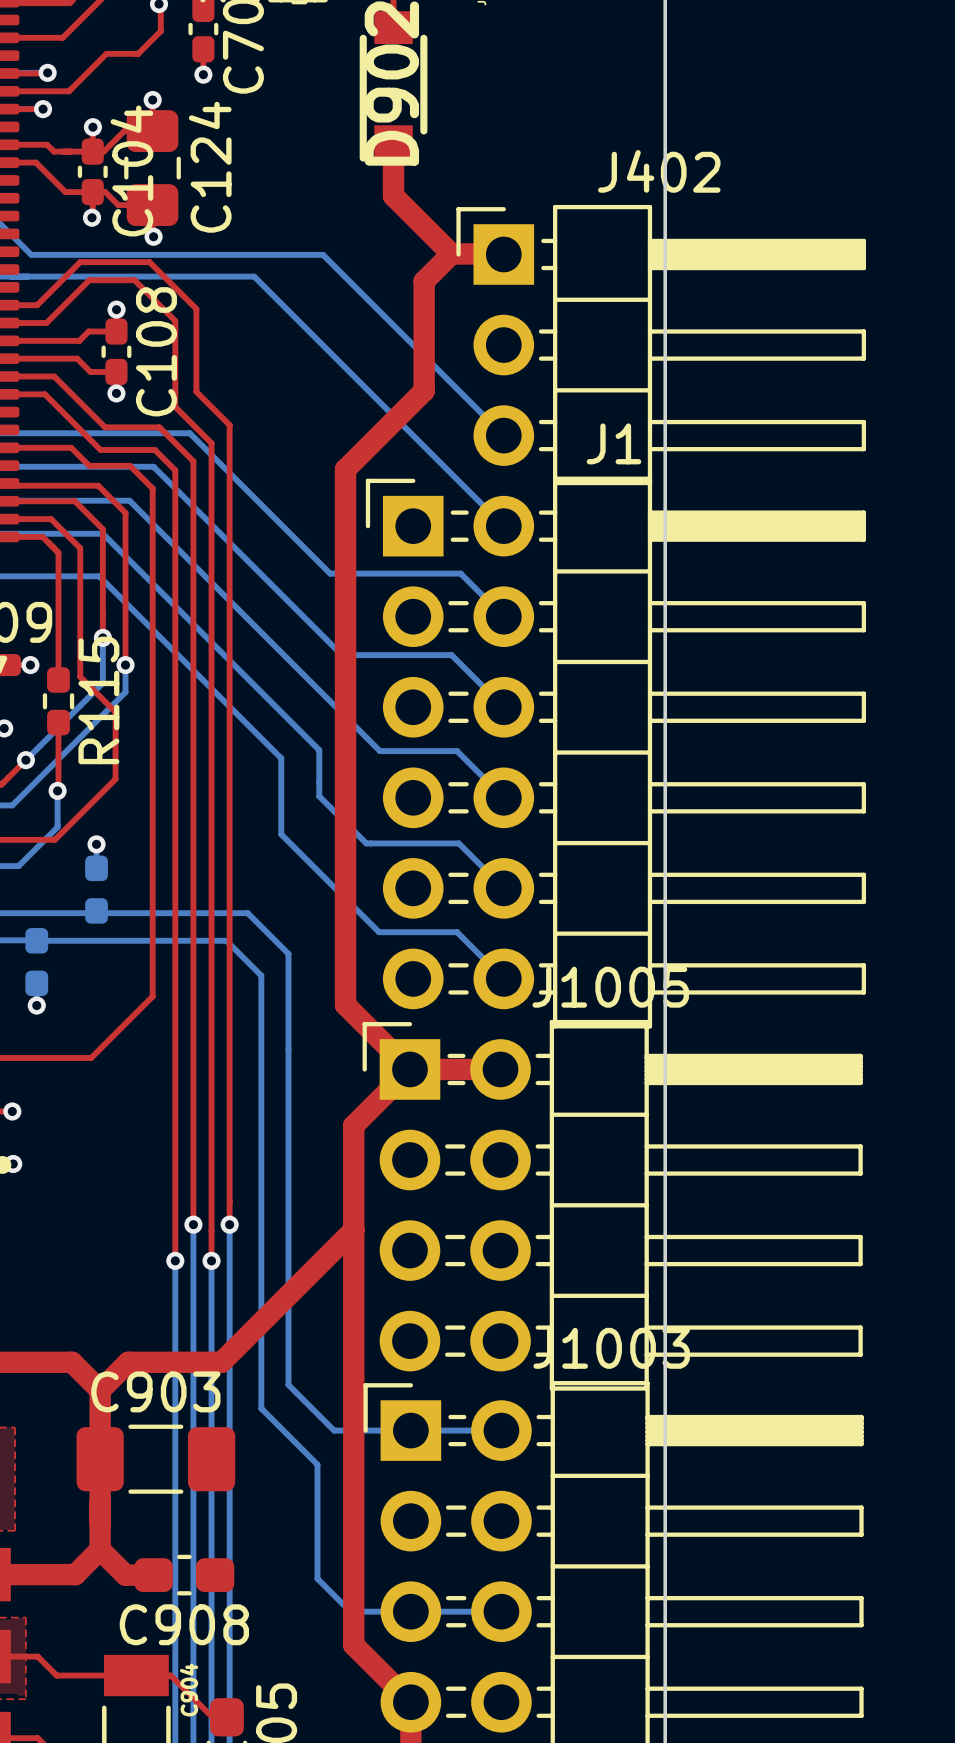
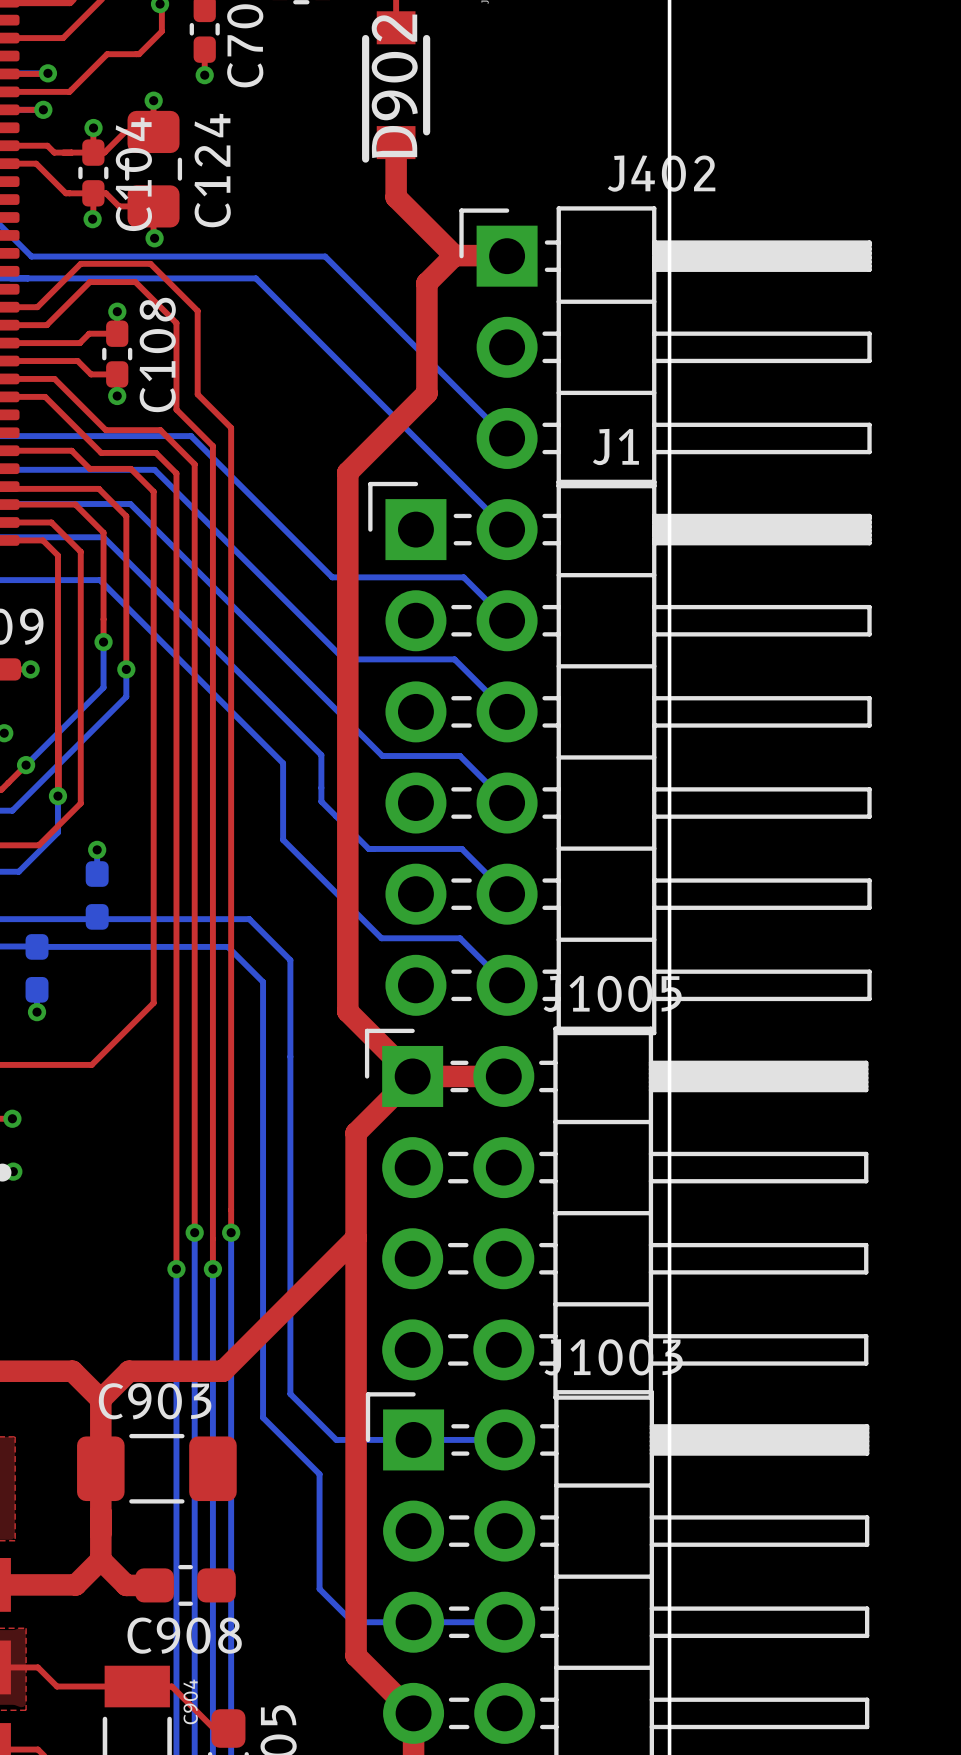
top track: (57, 551) (58, 679) -> (57, 555) (57, 796)
top track: (80, 676) (115, 712) (115, 779) (54, 839) (38, 839) -> (80, 681) (80, 803) (38, 845)
R115: (58, 701) -> none

